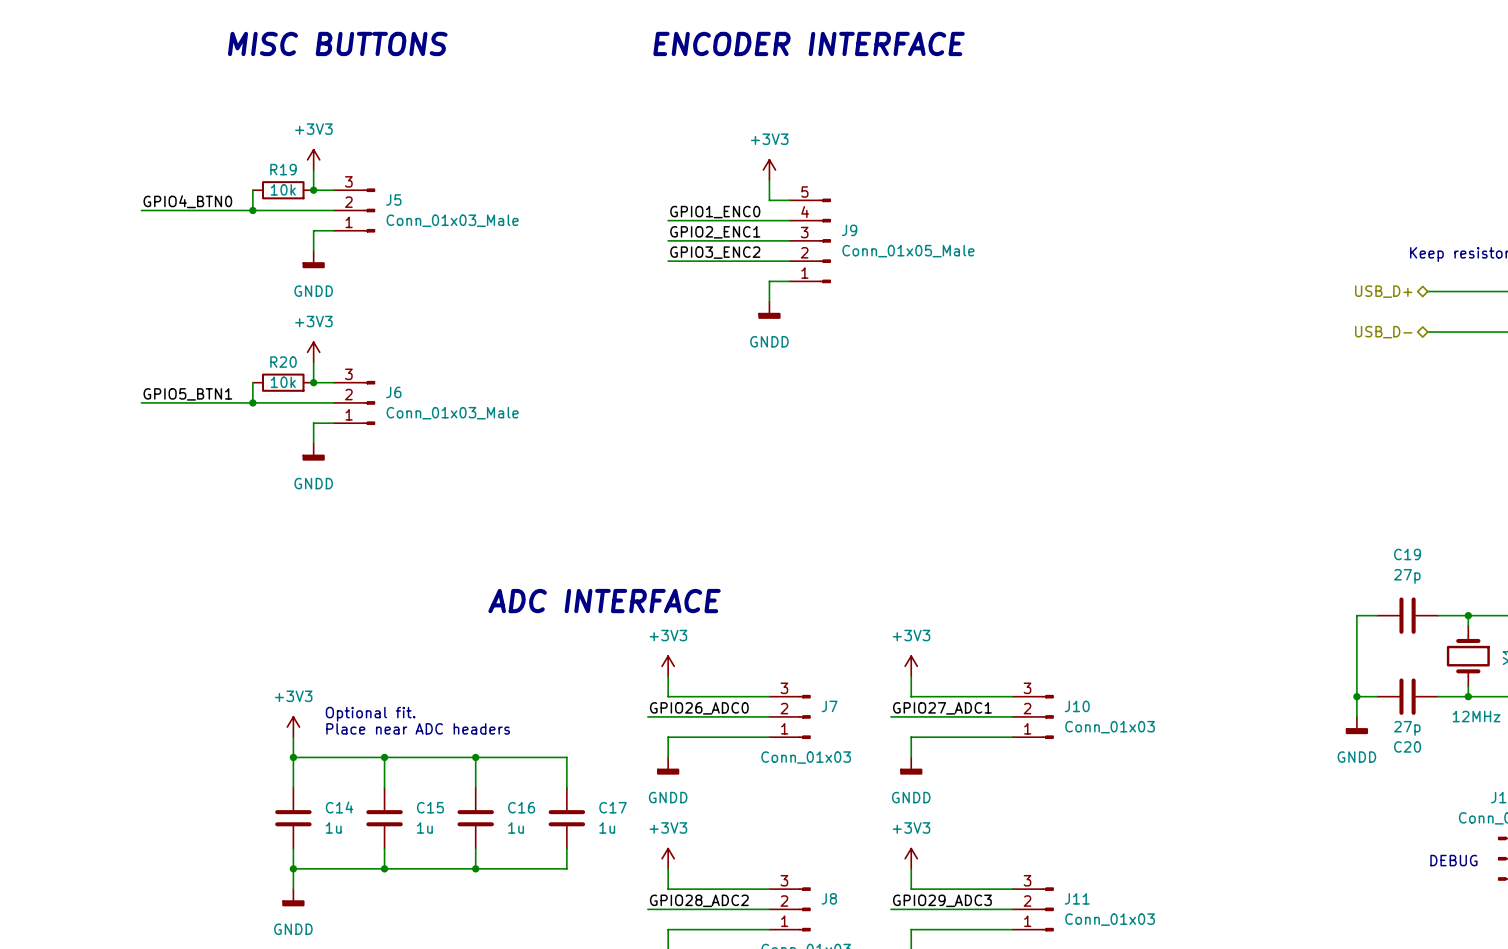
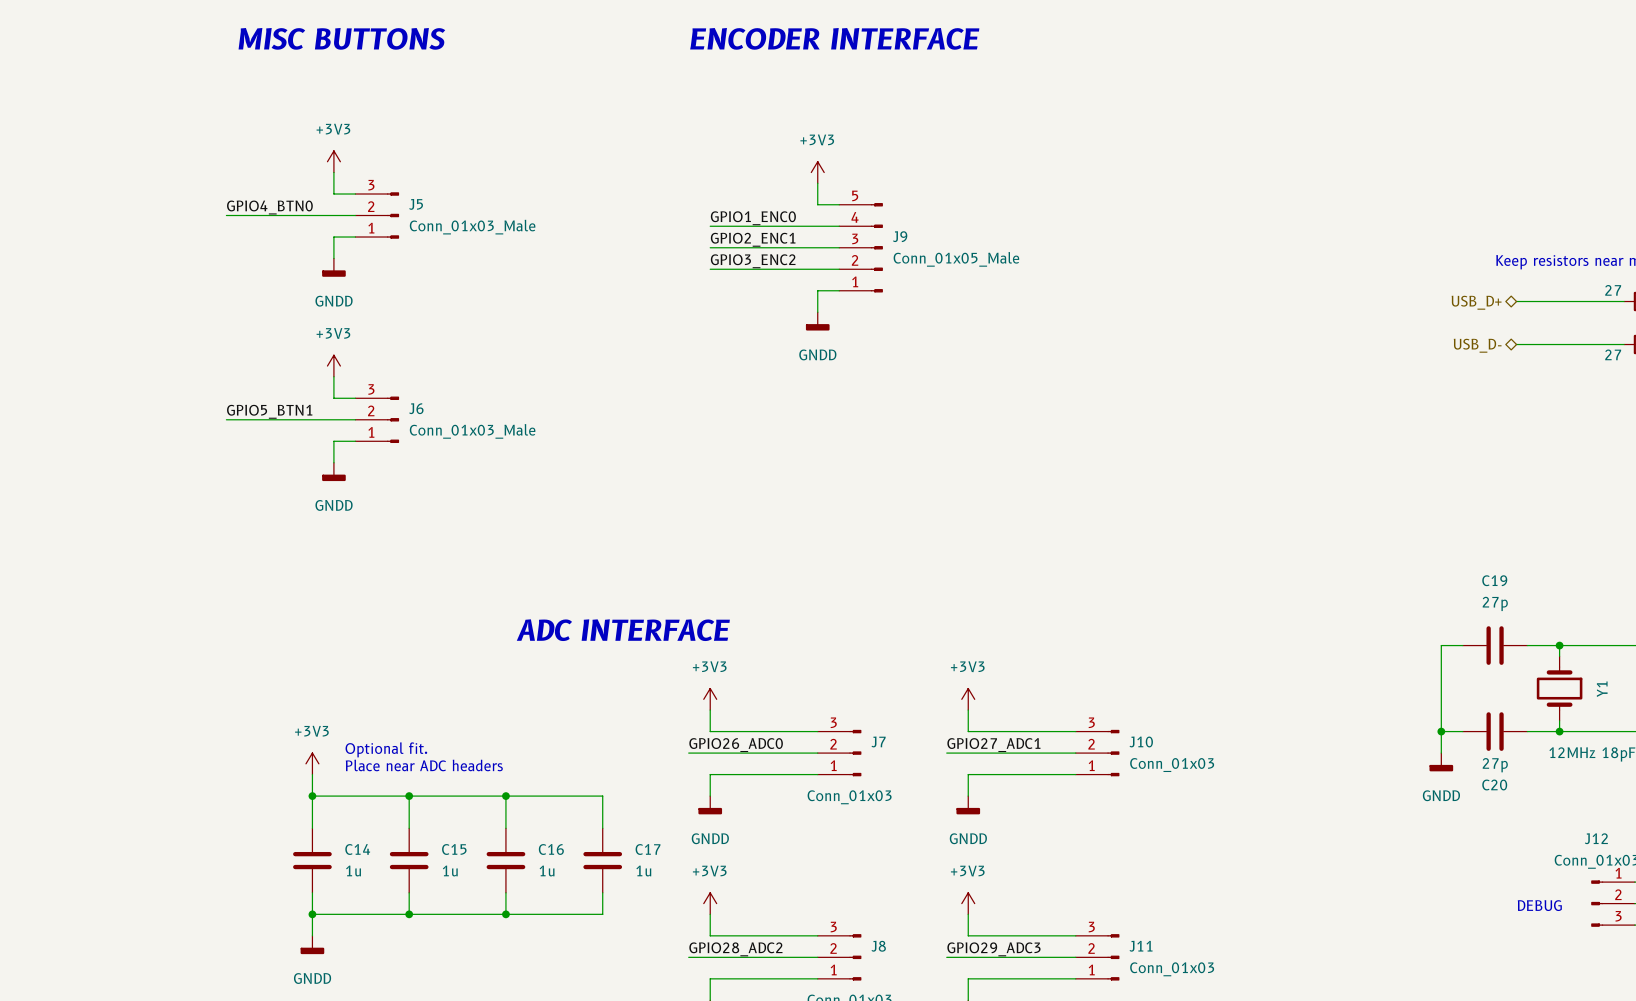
wire: (252, 190) (252, 210) -> none
R19: 10k (283, 190) -> none
junction: (313, 190) -> none
label position: GPIO4_BTN0 (187, 201) -> GPIO4_BTN0 (269, 207)
wire: (141, 210) (212, 210) -> none
junction: (252, 210) -> none
wire: (252, 382) (252, 402) -> none
R20: 10k (283, 382) -> none
junction: (313, 382) -> none
label position: GPIO5_BTN1 (187, 394) -> GPIO5_BTN1 (269, 411)
wire: (141, 402) (212, 402) -> none
junction: (252, 402) -> none

